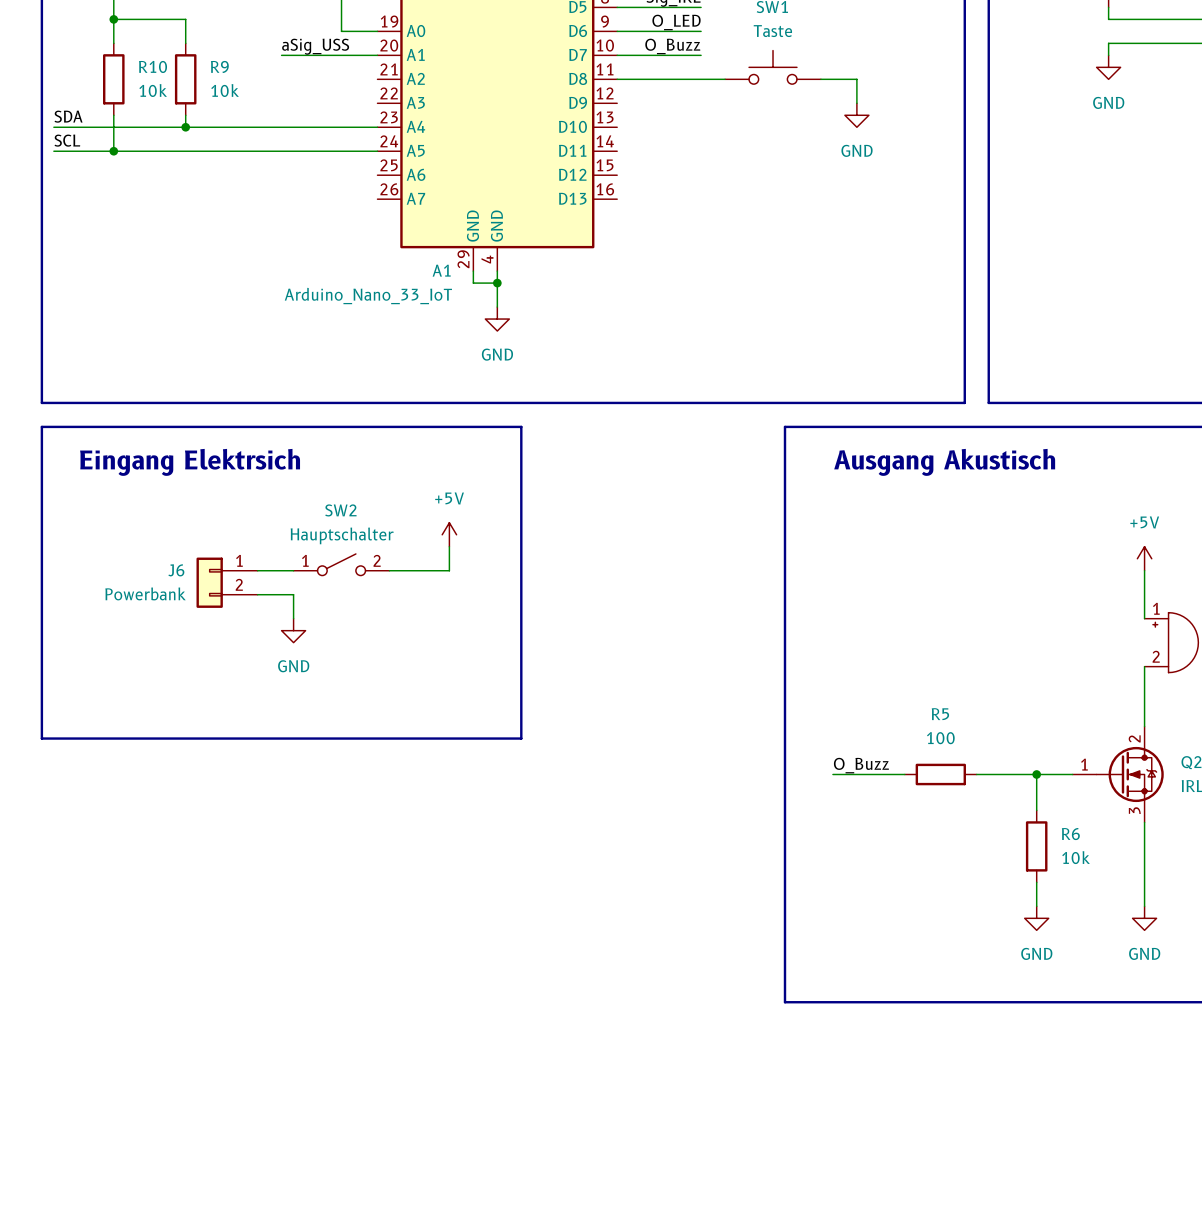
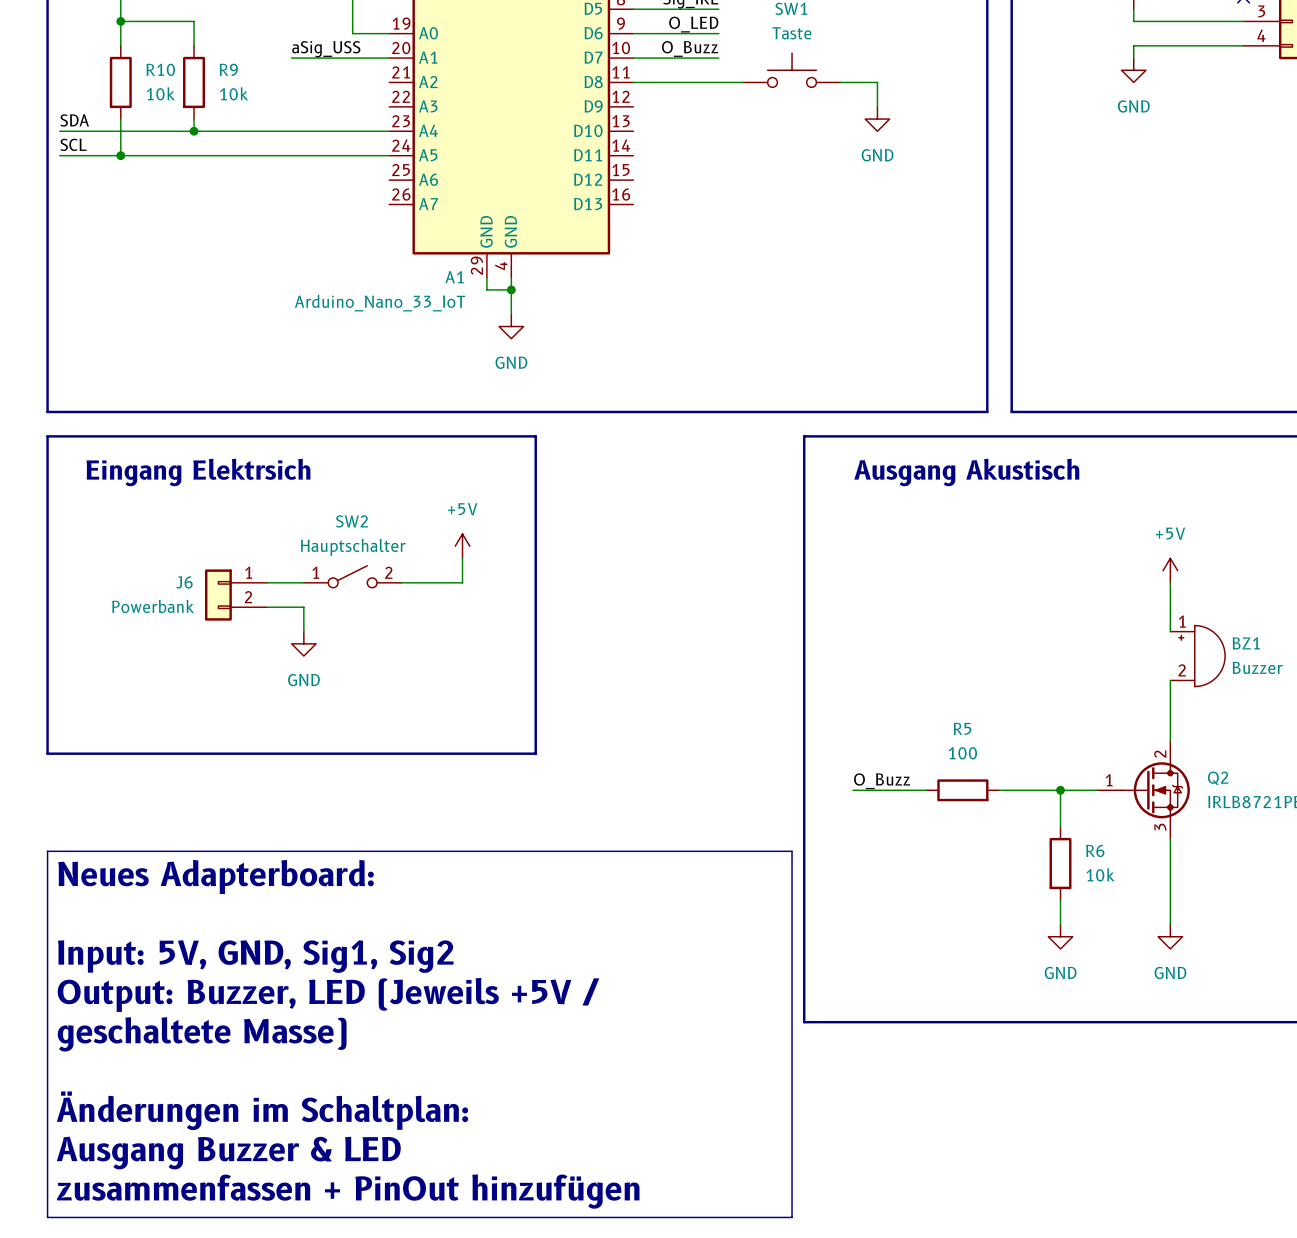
line: none -> (47, 851) (792, 851) (792, 1217) (47, 1217) (47, 851)
text: none -> Neues Adapterboard: (216, 877)
text: none -> Input: 5V, GND, Sig1, Sig2 (255, 956)
text: none -> Output: Buzzer, LED (Jeweils +5V / (328, 994)
text: none -> geschaltete Masse) (202, 1034)
text: none -> Änderungen im Schaltplan: (262, 1110)
text: none -> Ausgang Buzzer & LED (228, 1153)
text: none -> zusammenfassen + PinOut hinzufügen (348, 1191)

